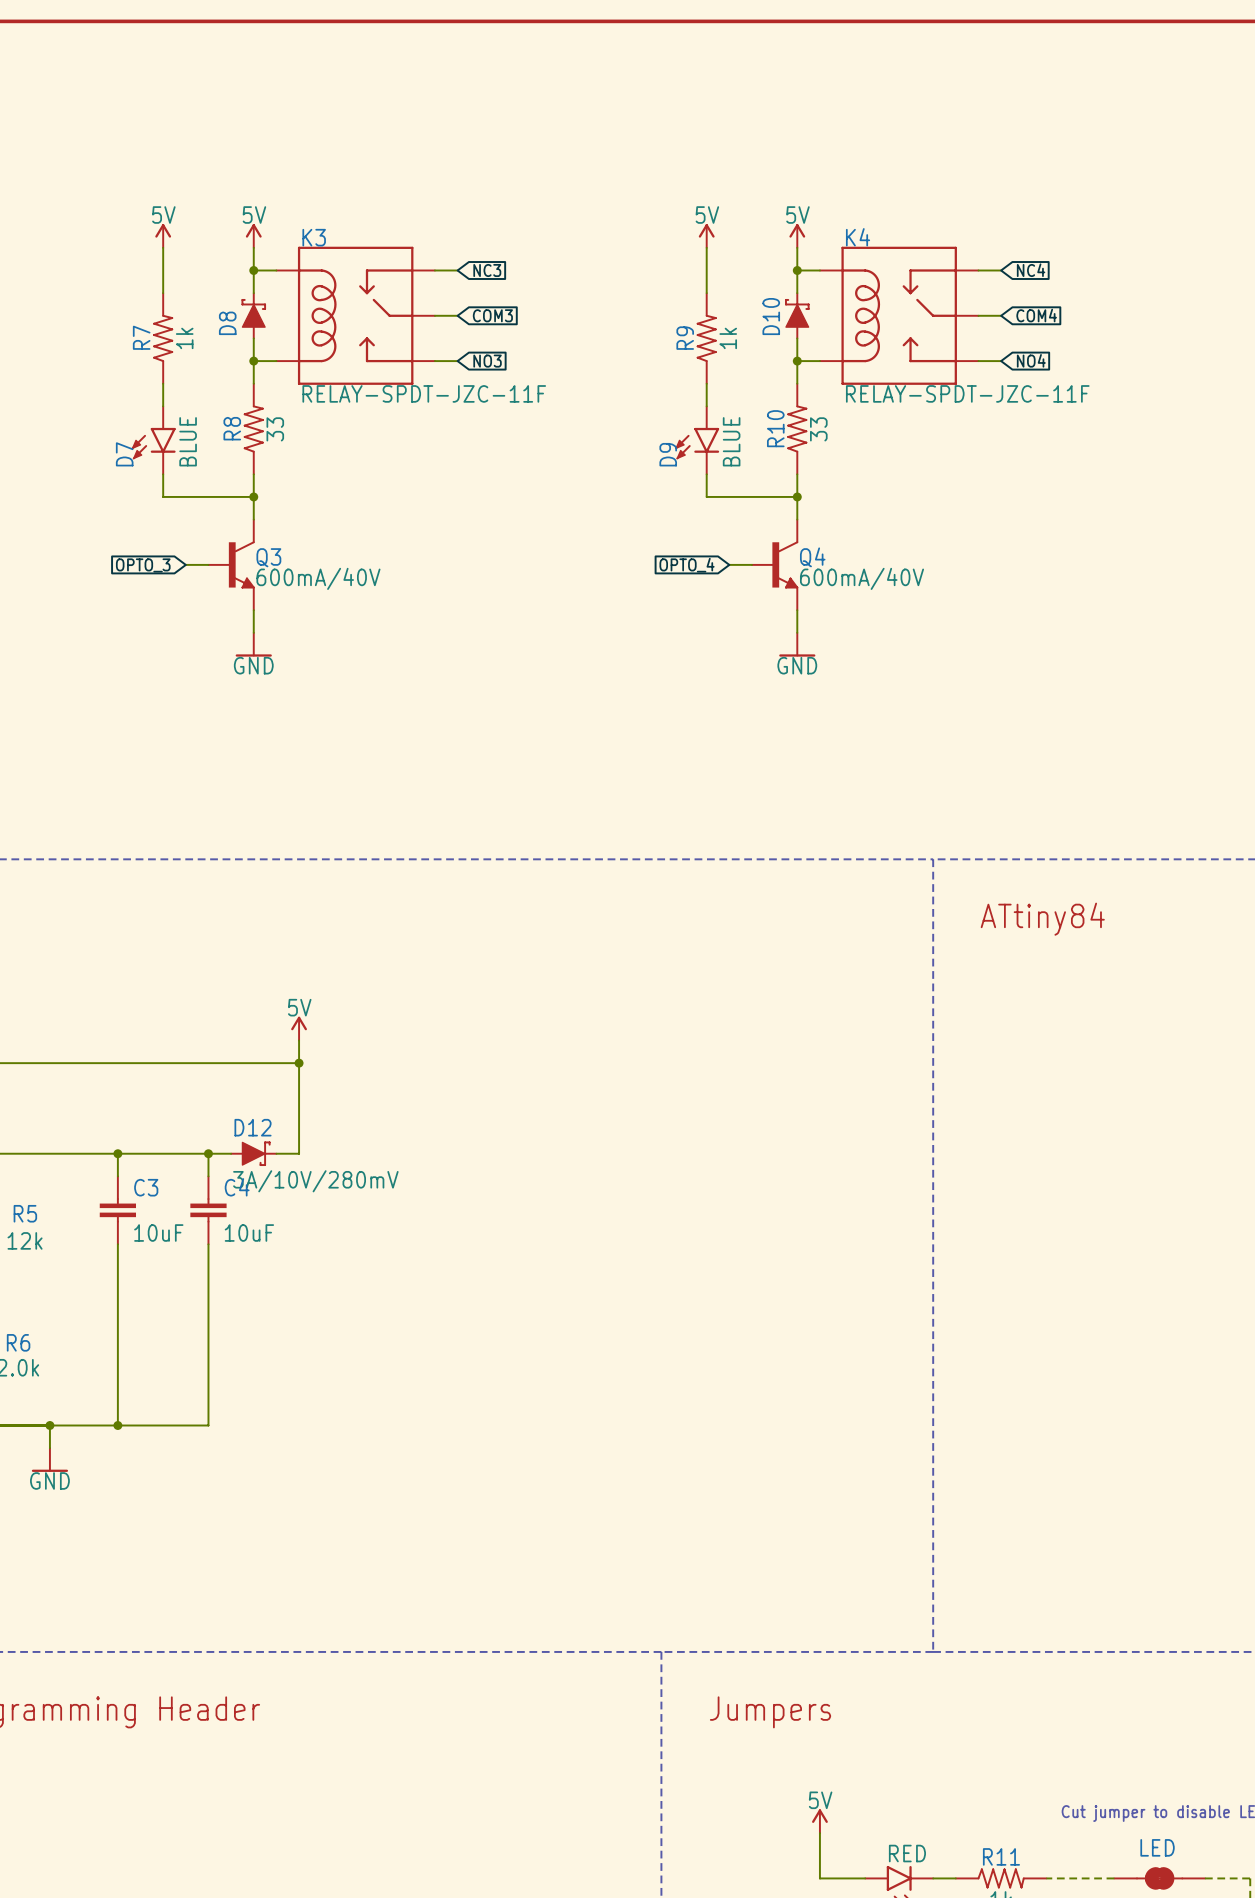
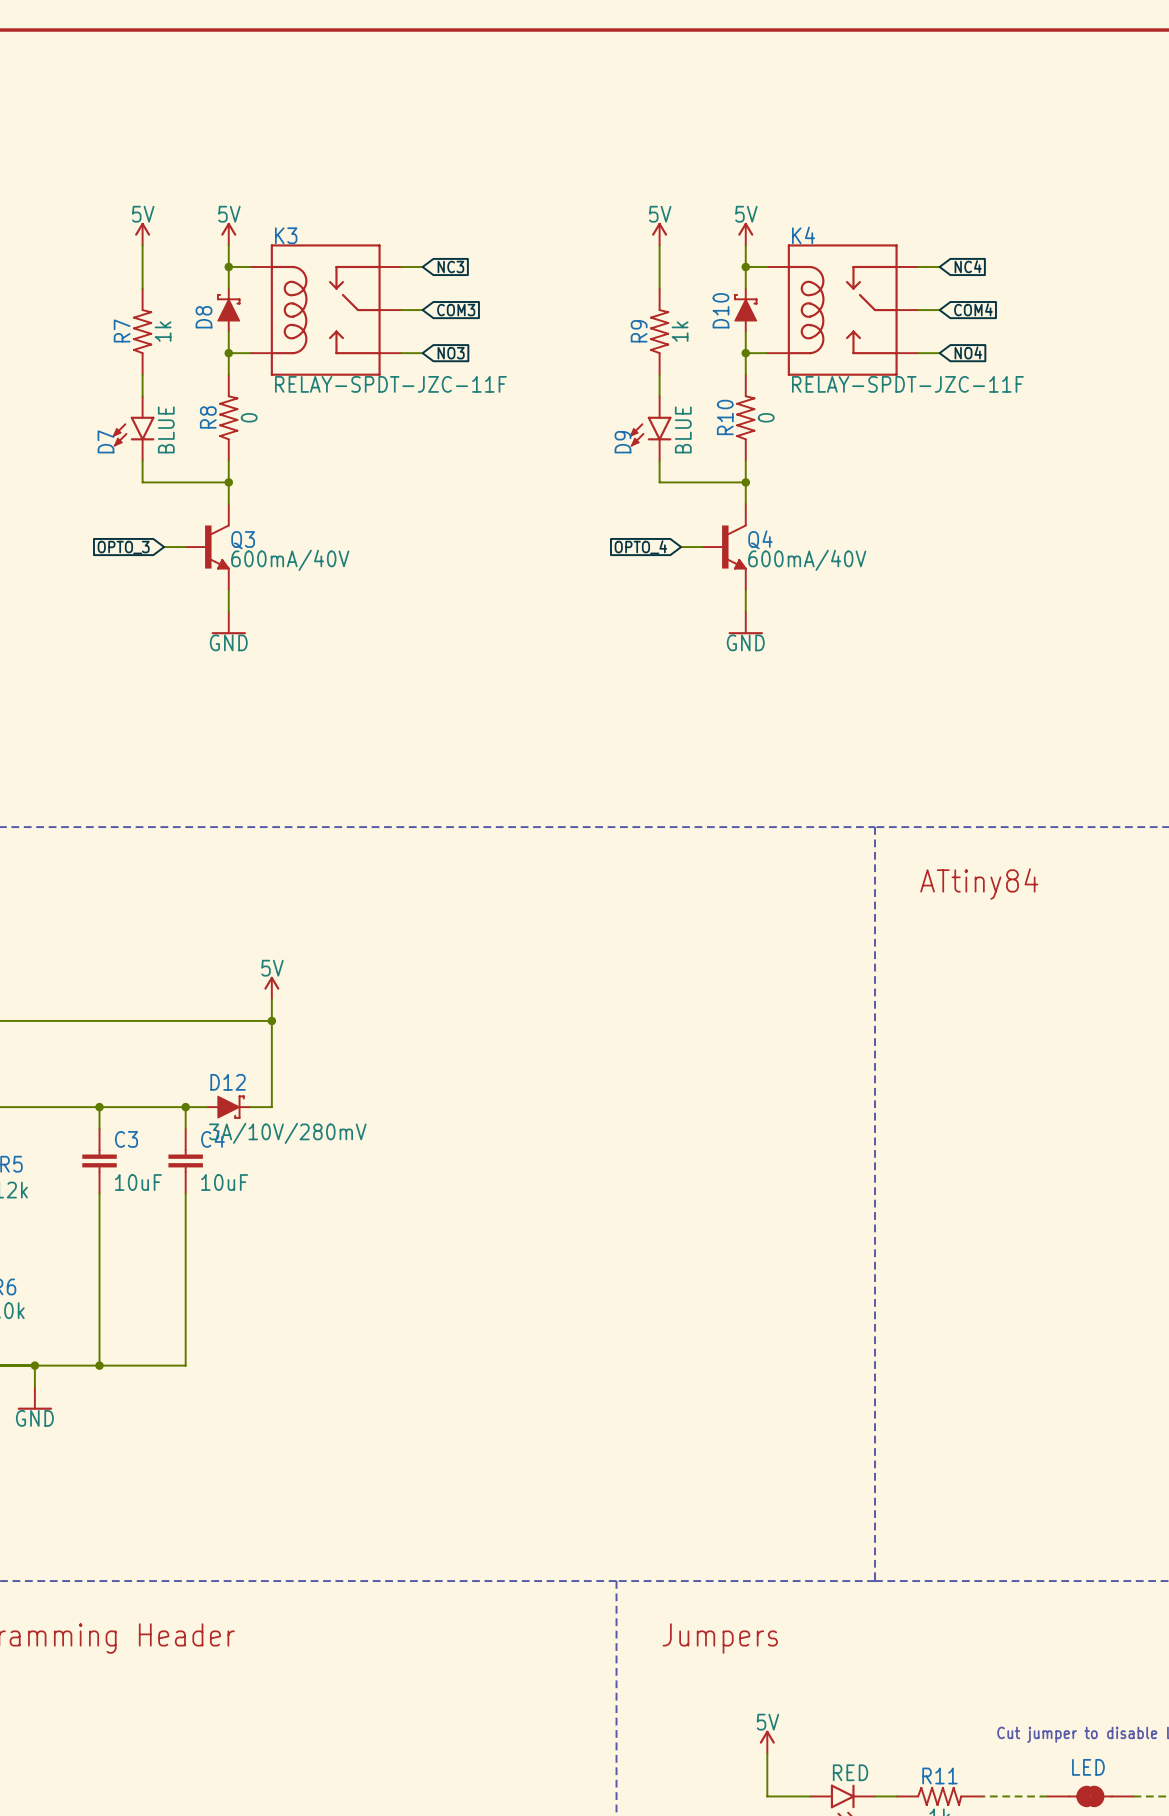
R8 value: 33 (275, 429) -> 0 (249, 417)
R10 value: 33 (818, 429) -> 0 (766, 417)

